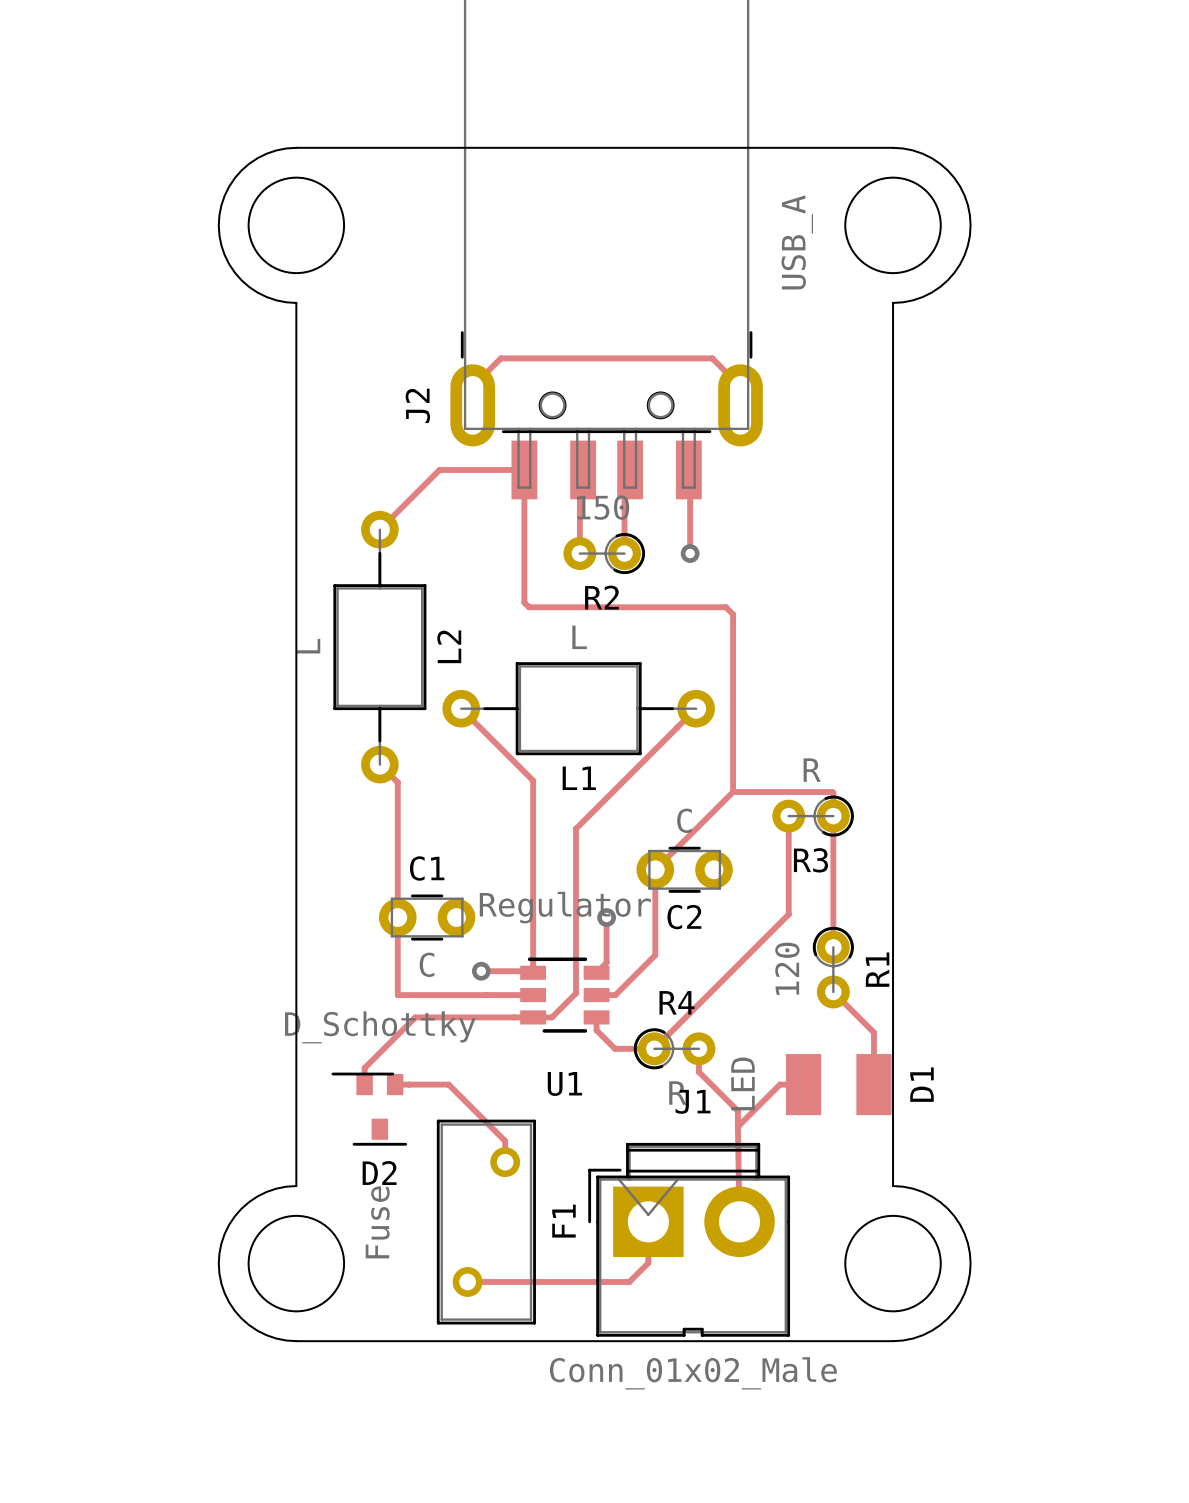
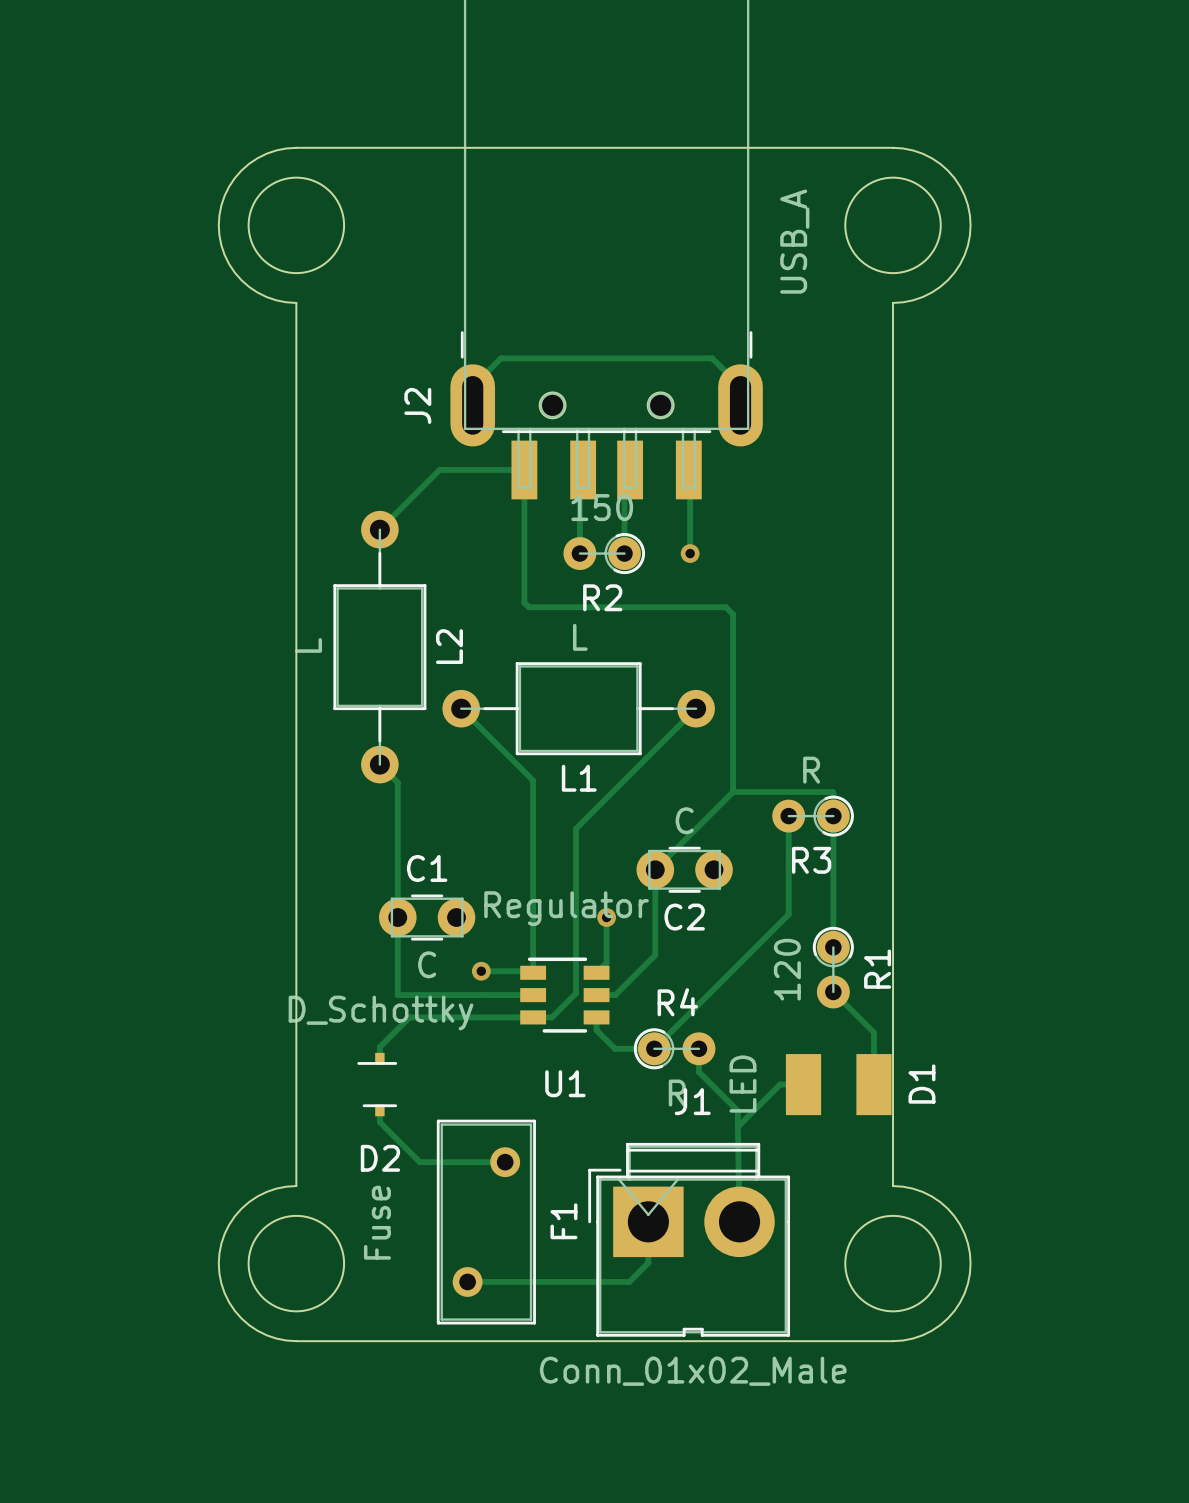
track: (415, 1017) (364, 1068) (364, 1084) -> (415, 1017) (409, 1017) (379, 1047) (379, 1058)
D2 footprint: [331, 1072, 408, 1146] -> [357, 1052, 398, 1117]
track: (395, 1084) (448, 1084) (505, 1141) (505, 1162) -> (379, 1110) (379, 1122) (419, 1162) (505, 1162)

